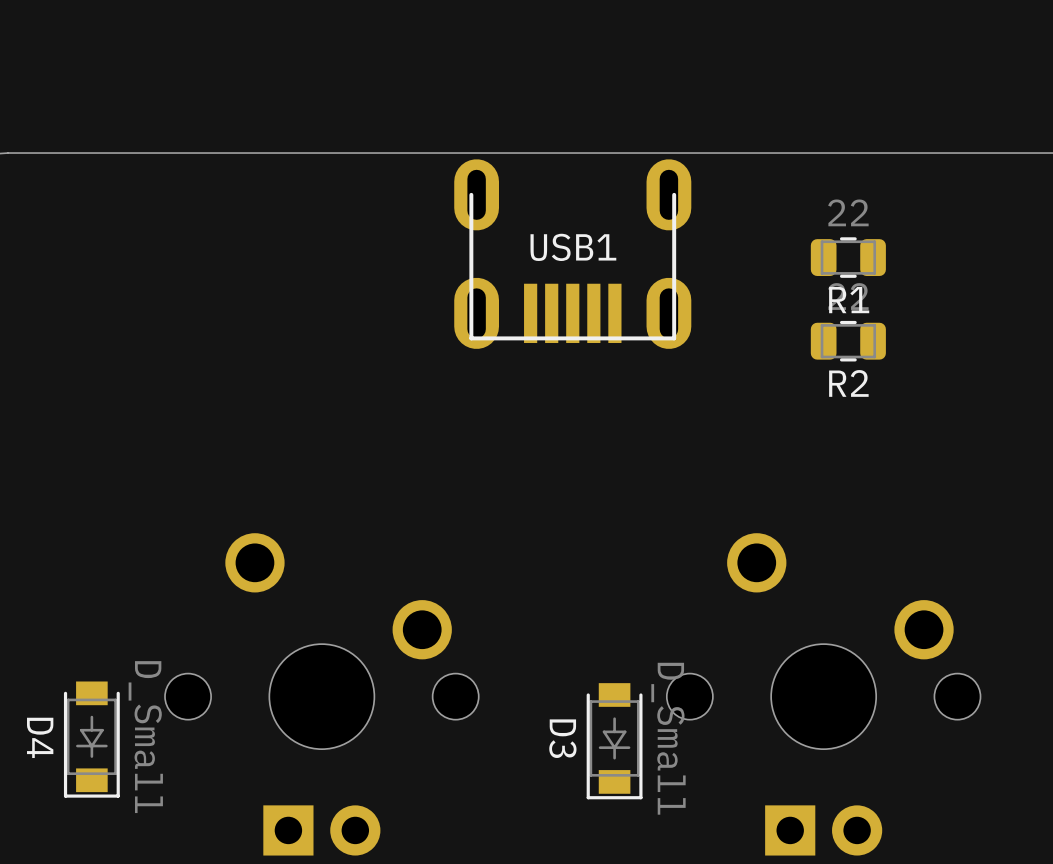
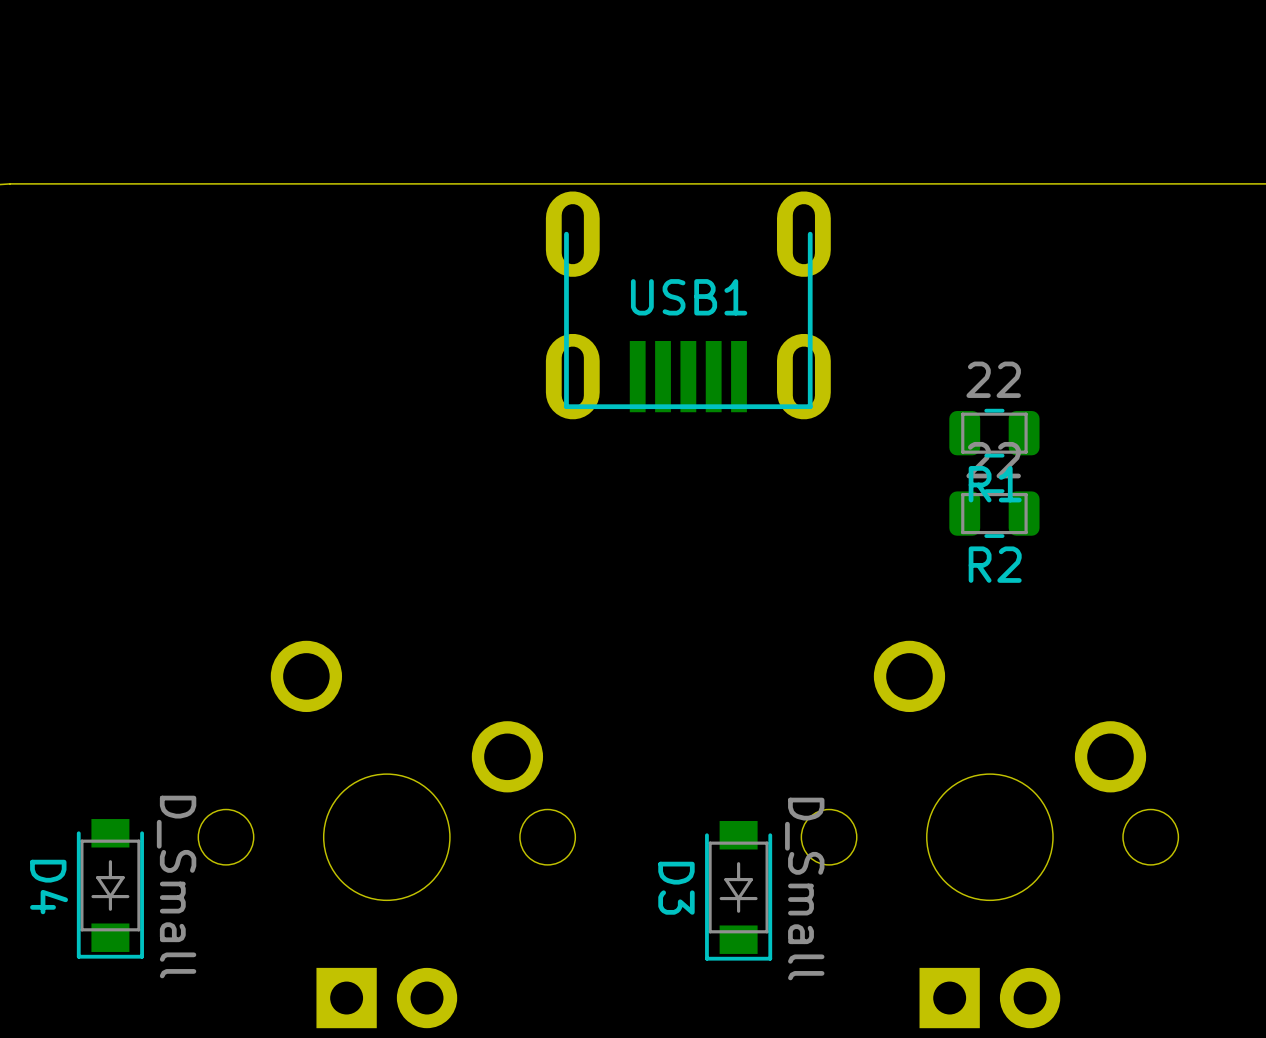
R1 position: (848, 257) -> (994, 433)
R2 position: (848, 341) -> (994, 513)

